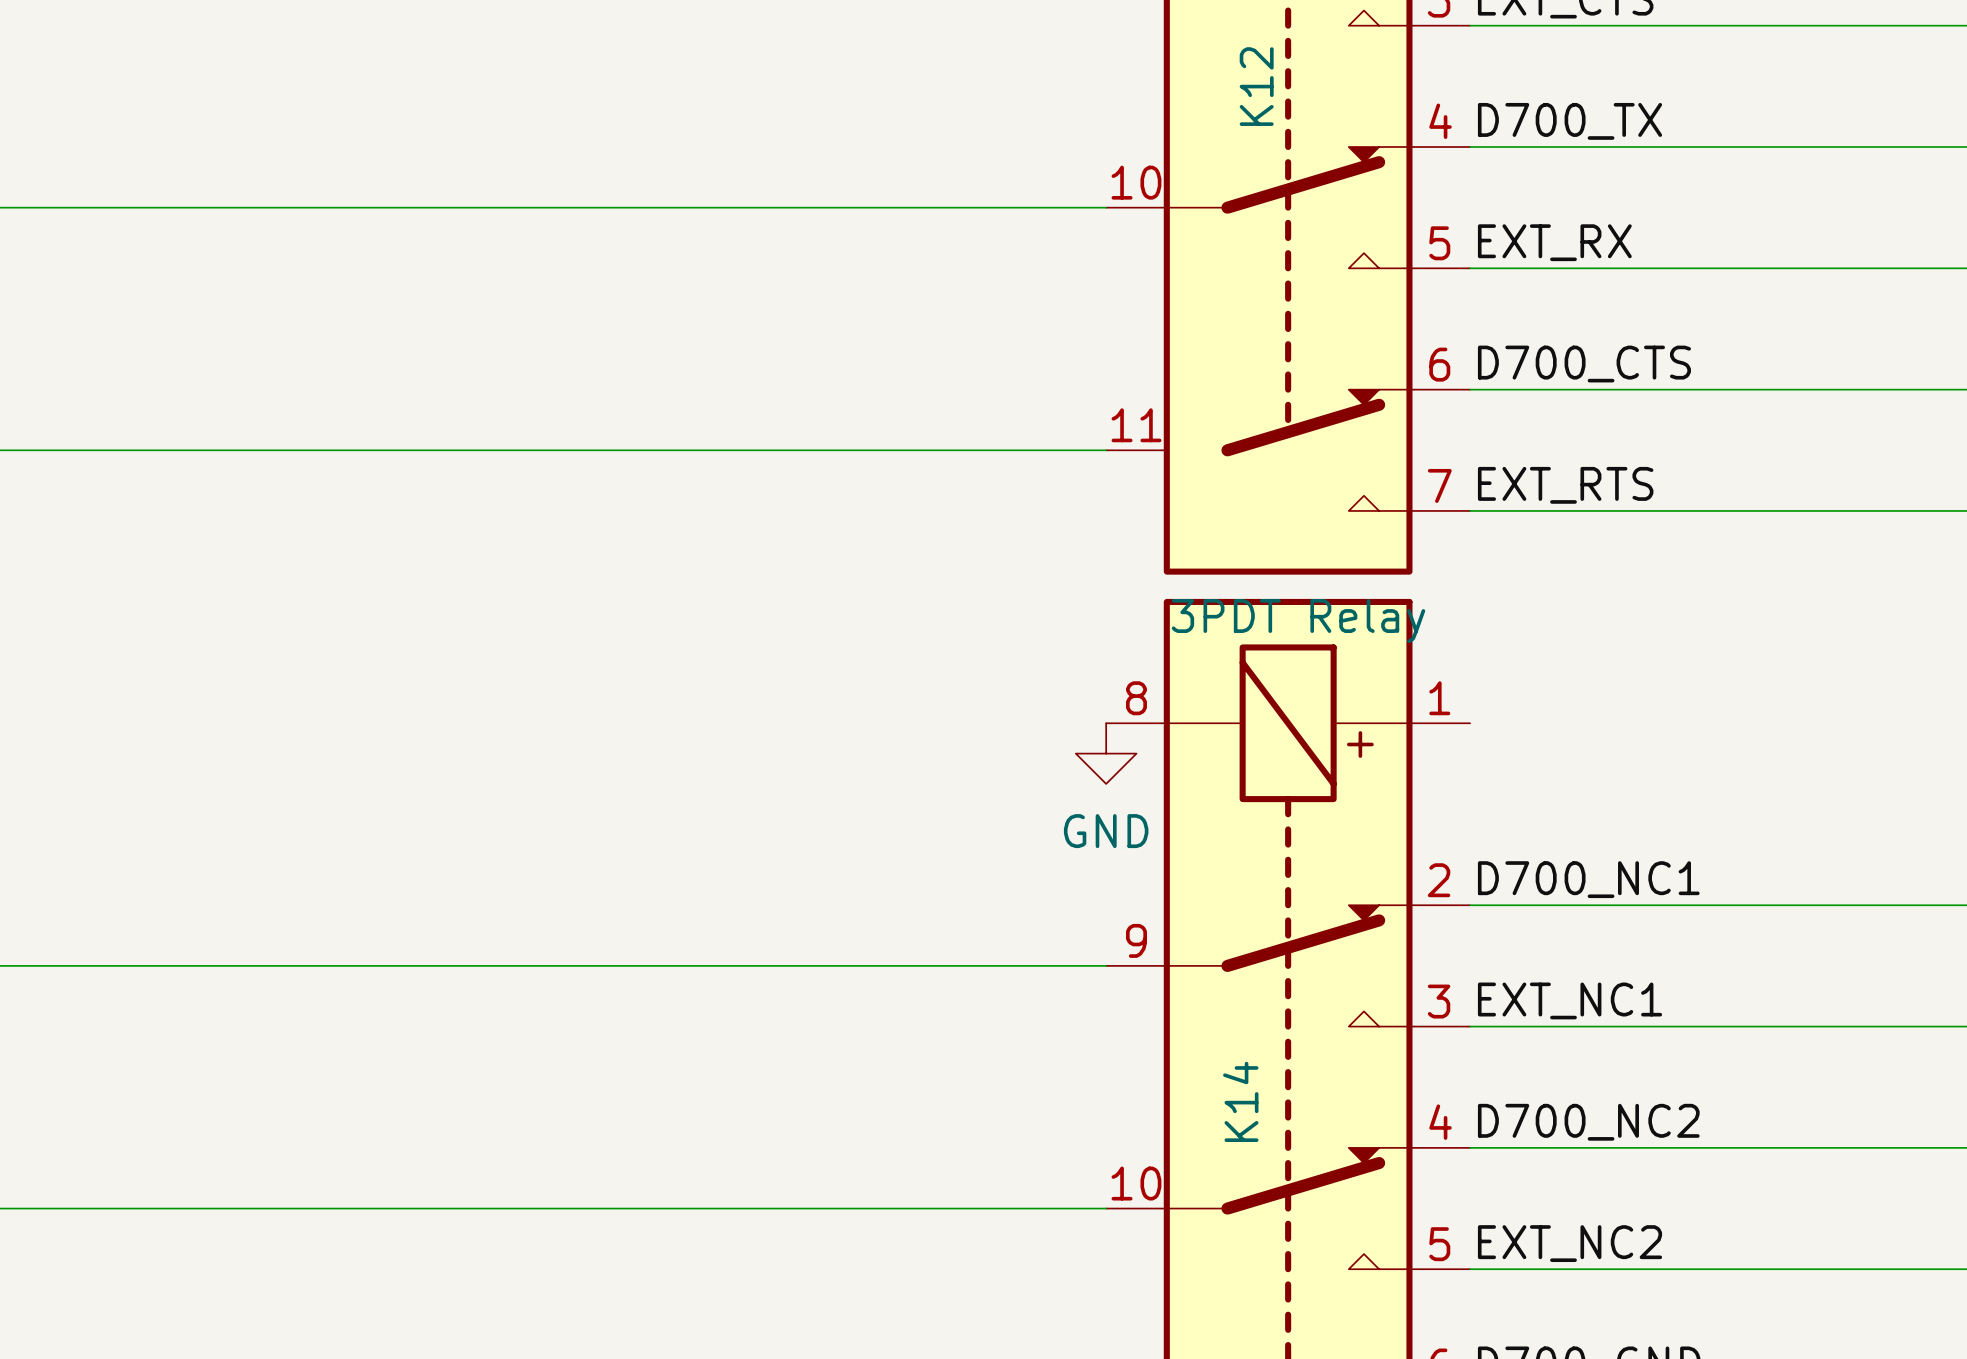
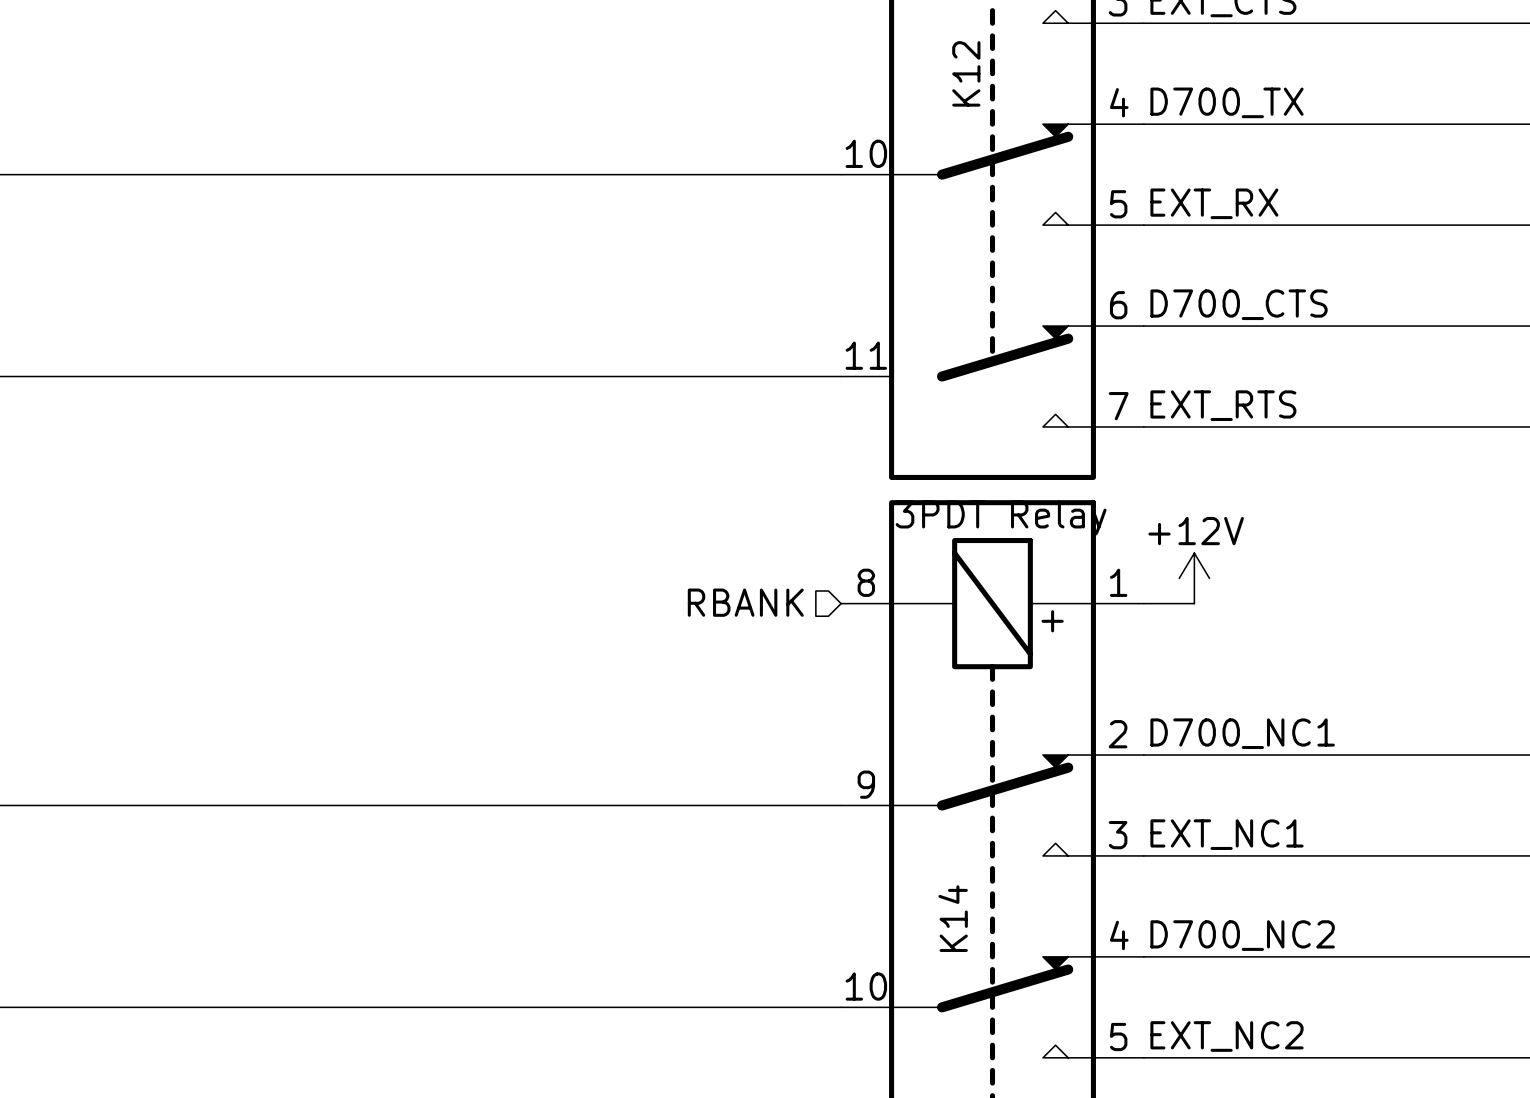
power symbol: none -> +12V (1194, 578)
hierarchical label: none -> RBANK (745, 602)
wire: none -> (1143, 603) (1194, 603)
power symbol: GND (1106, 753) -> none

